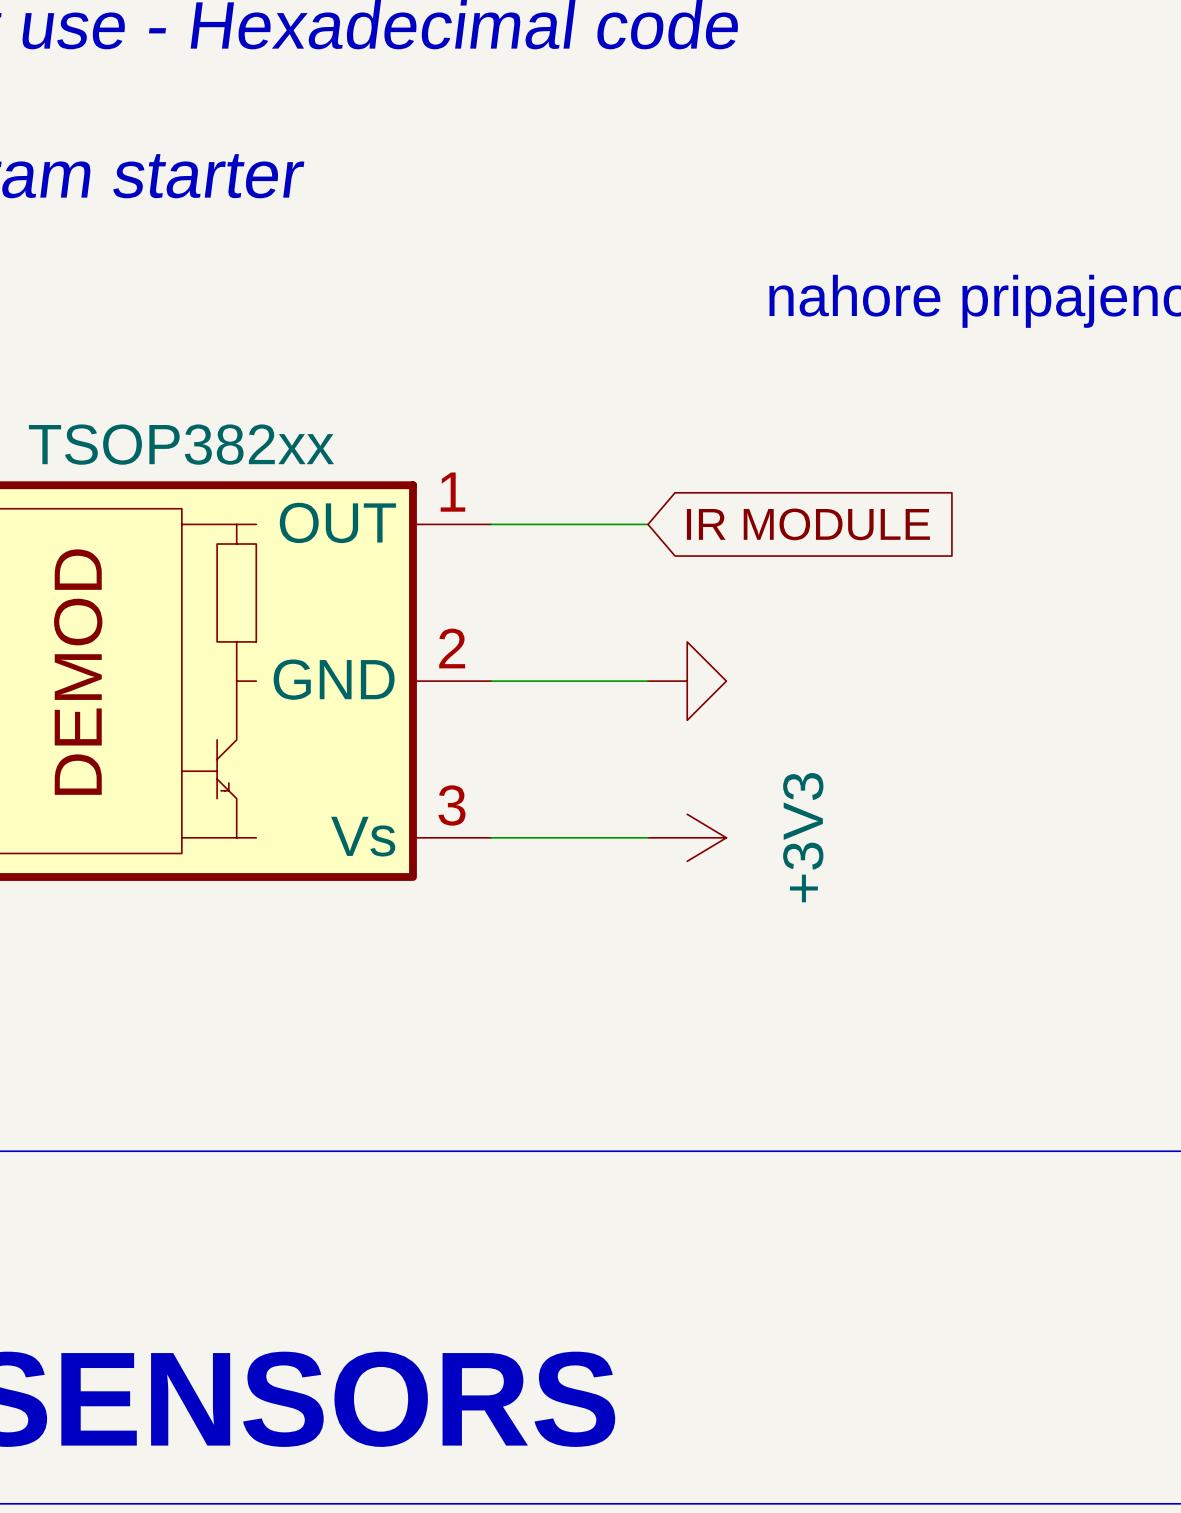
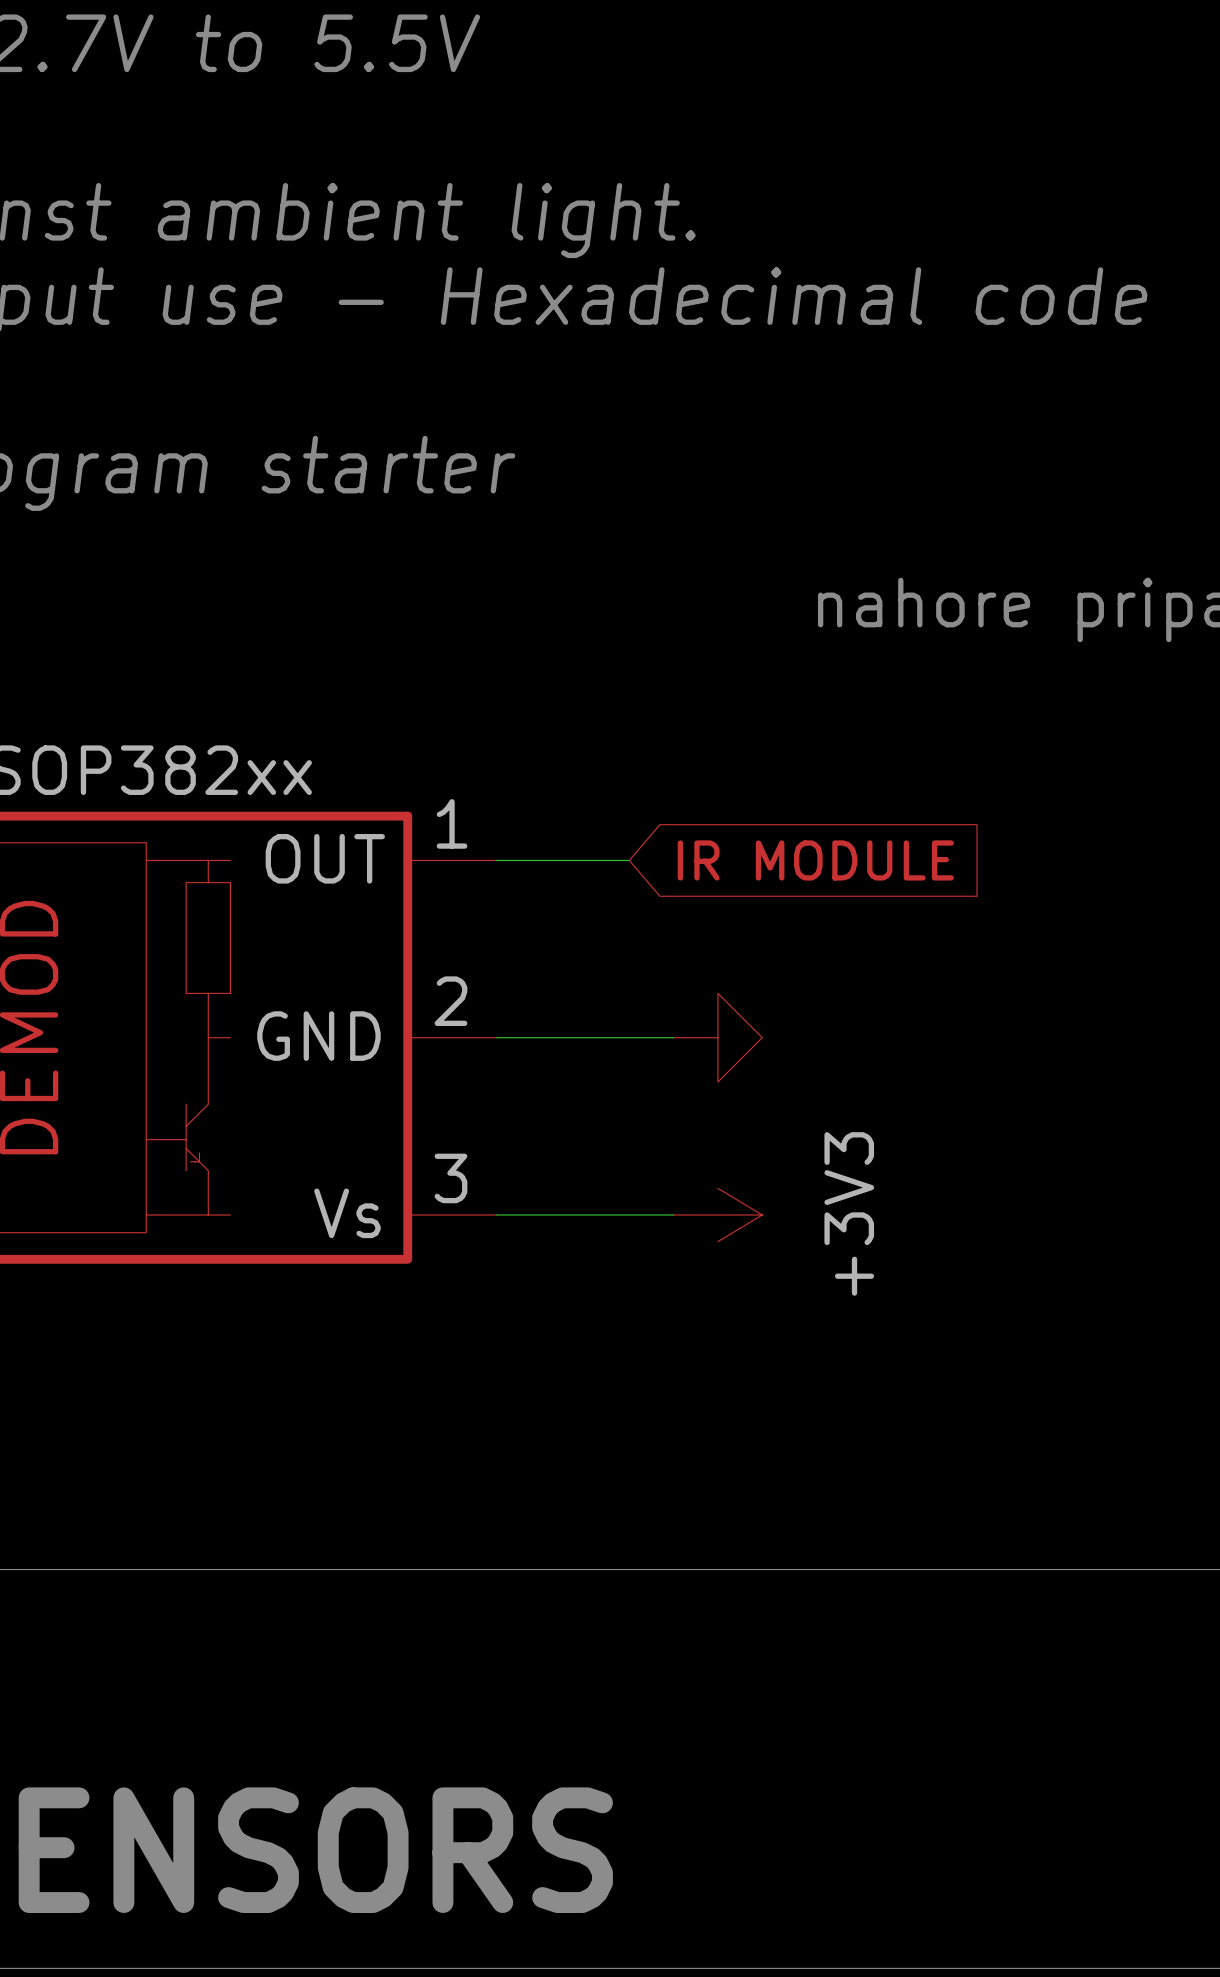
wire: (608, 524) (648, 524) -> none
global label position: IR MODULE (808, 524) -> IR MODULE (815, 860)

